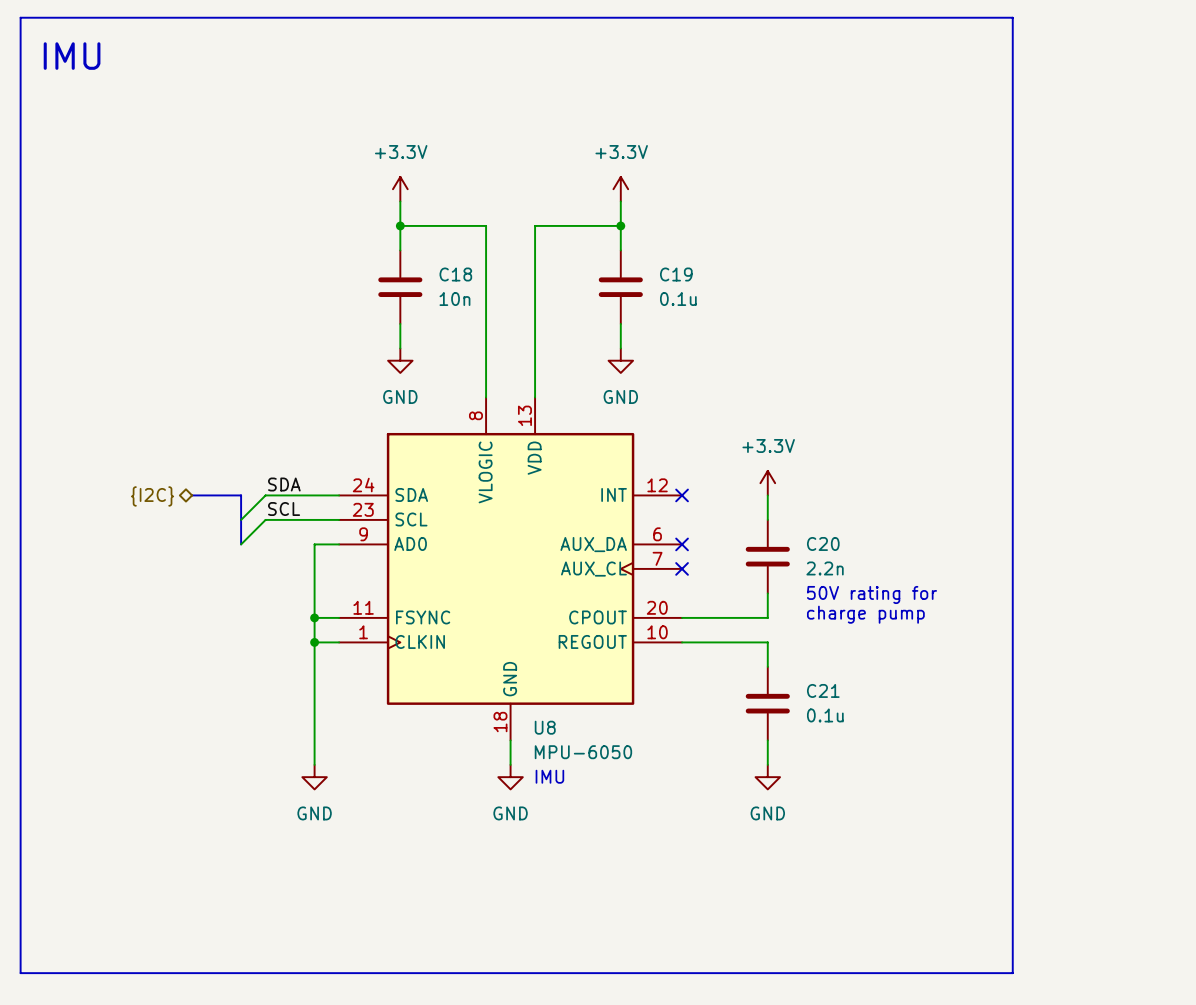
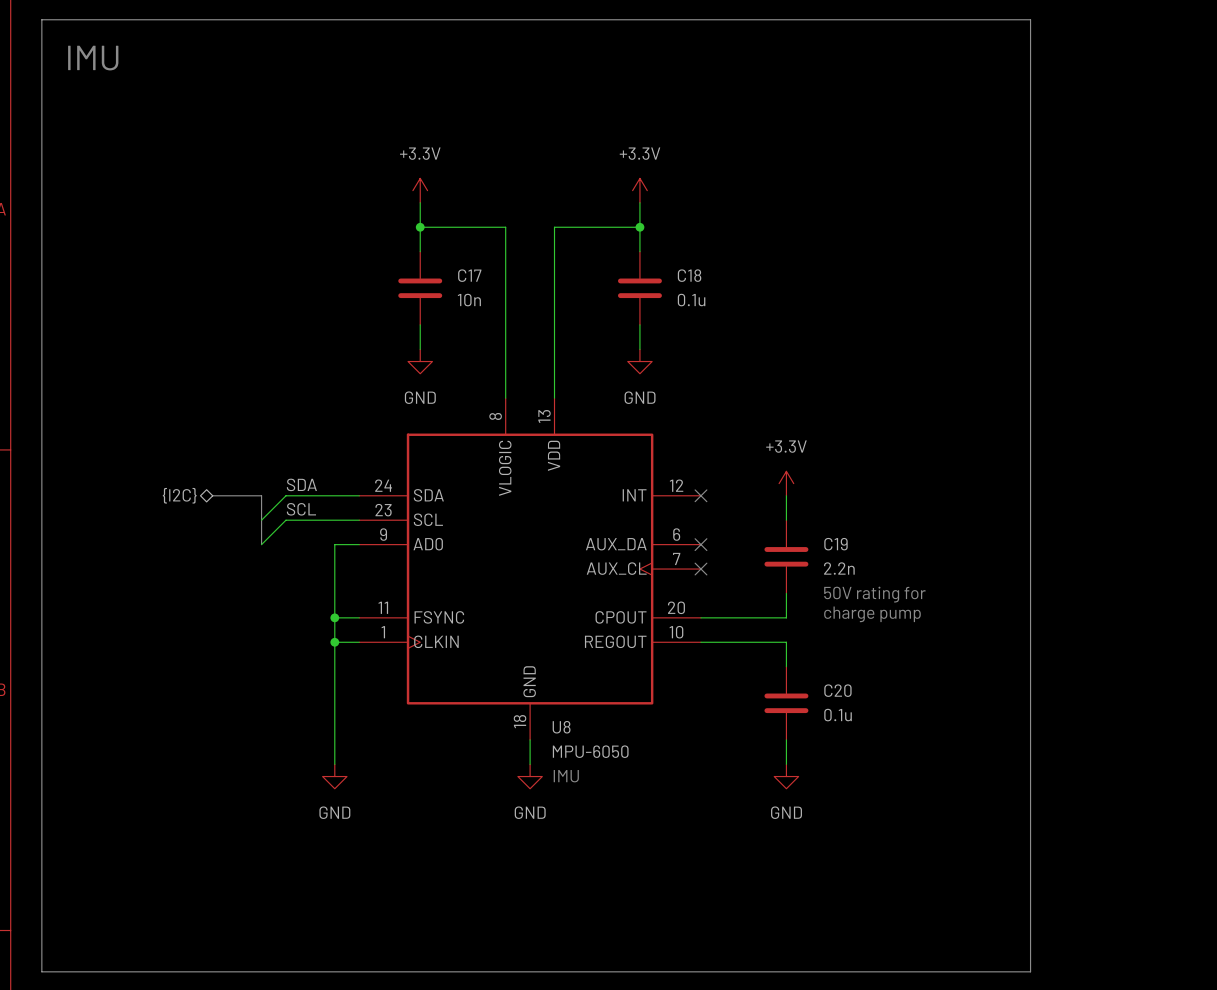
C18 name: C18 (455, 274) -> C17 (469, 275)
C19 name: C19 (676, 274) -> C18 (689, 275)
C20 name: C20 (823, 543) -> C19 (835, 544)
C21 name: C21 (823, 690) -> C20 (837, 690)

